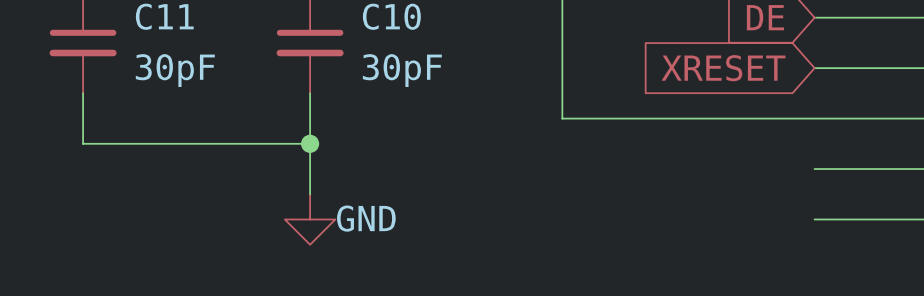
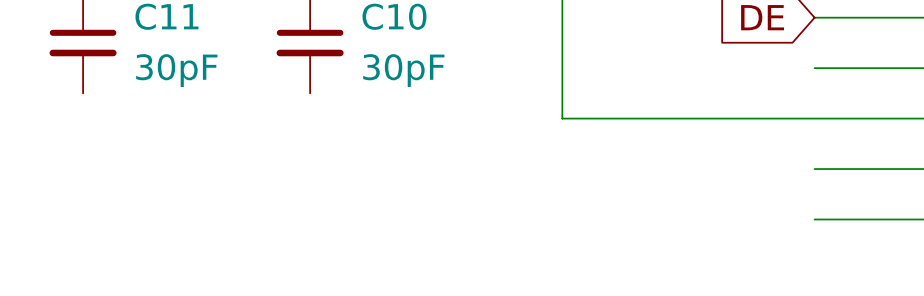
global label: XRESET (723, 68) -> none
wire: (83, 93) (83, 143) (310, 143) -> none
wire: (310, 93) (310, 194) -> none
junction: (310, 143) -> none
power symbol: GND (310, 219) -> none

